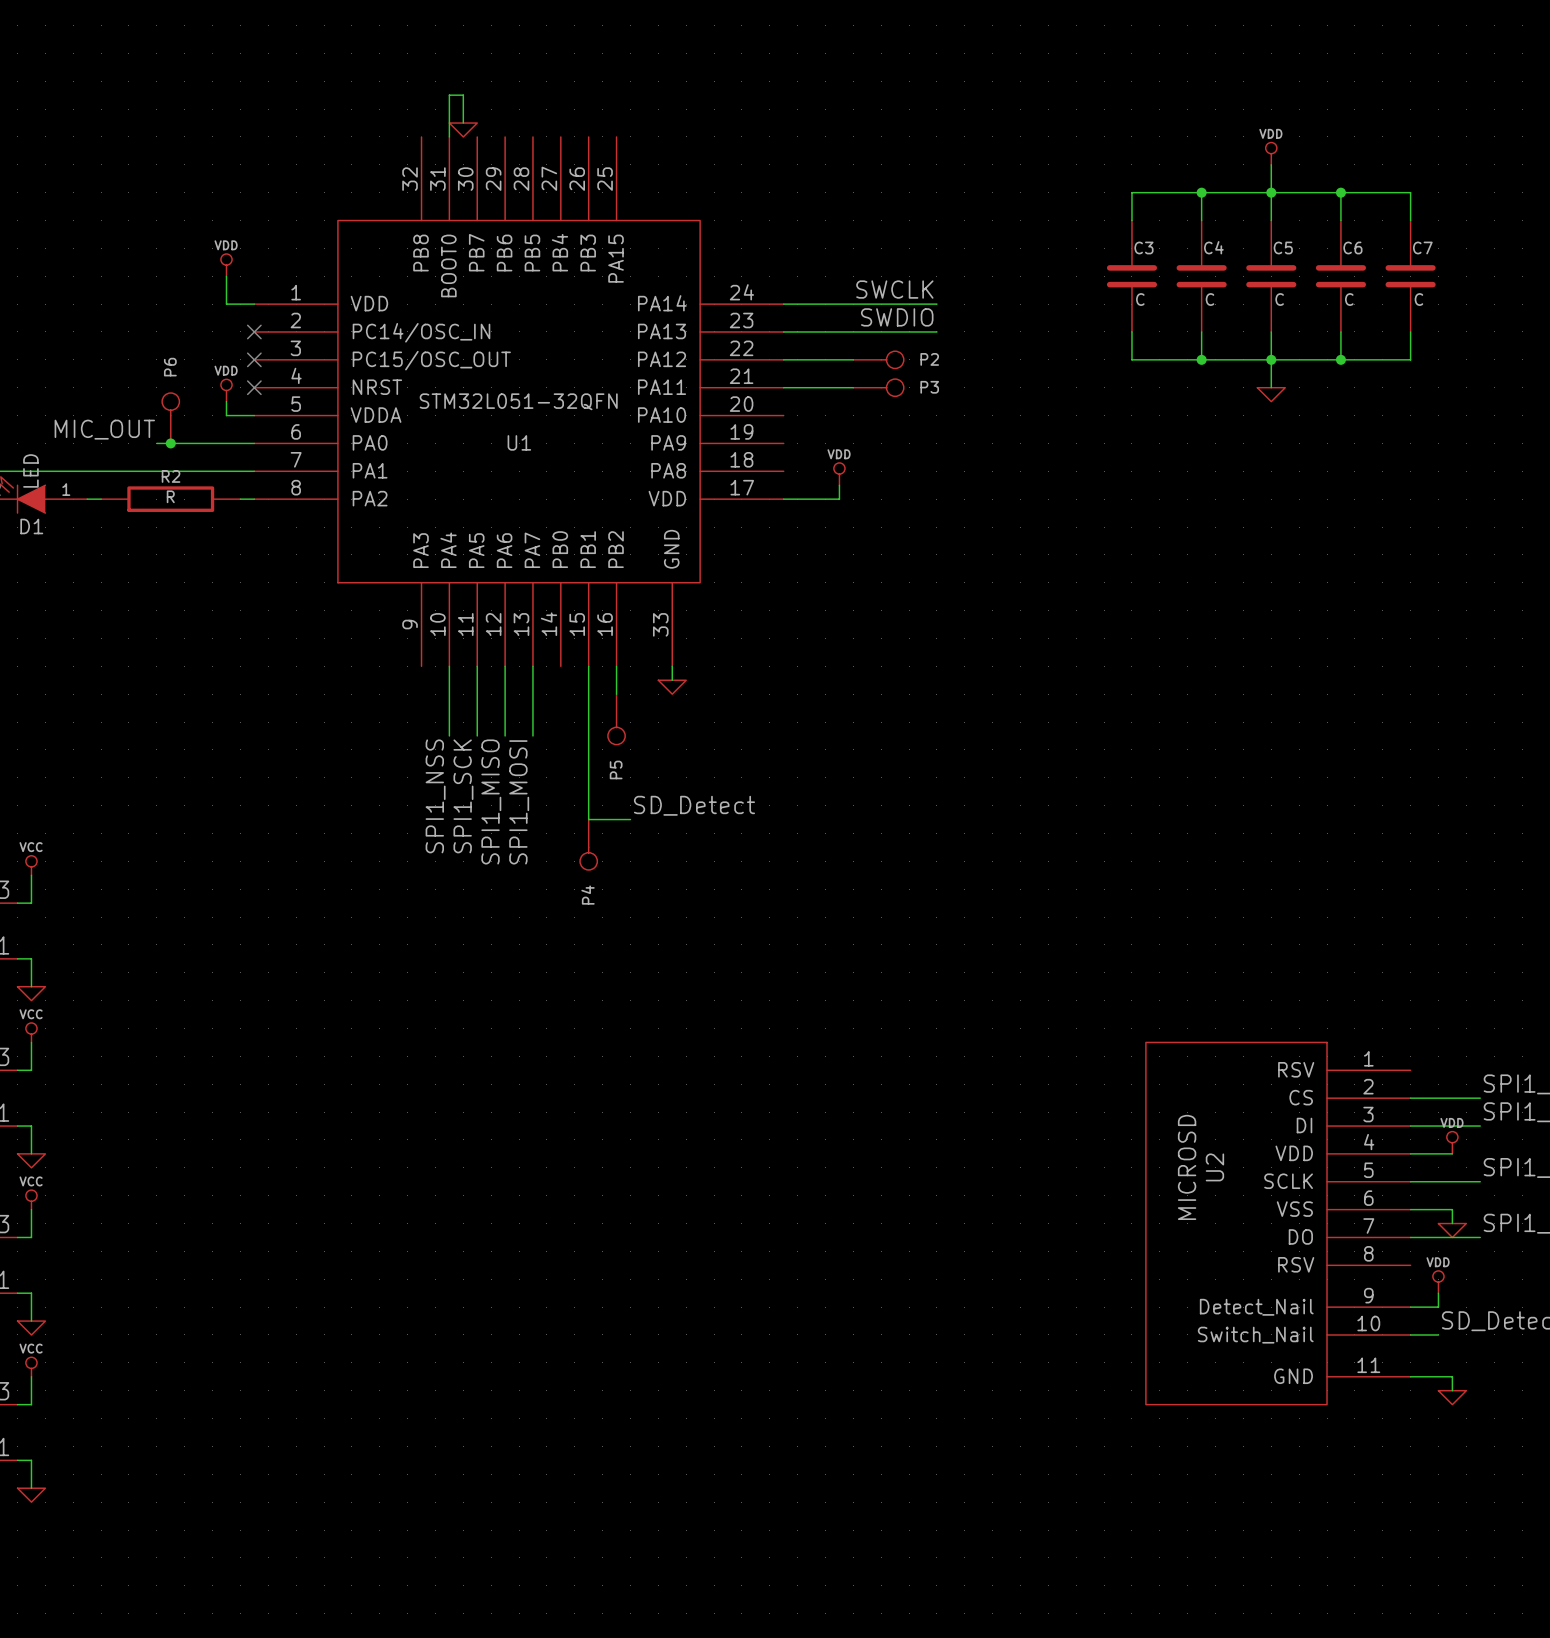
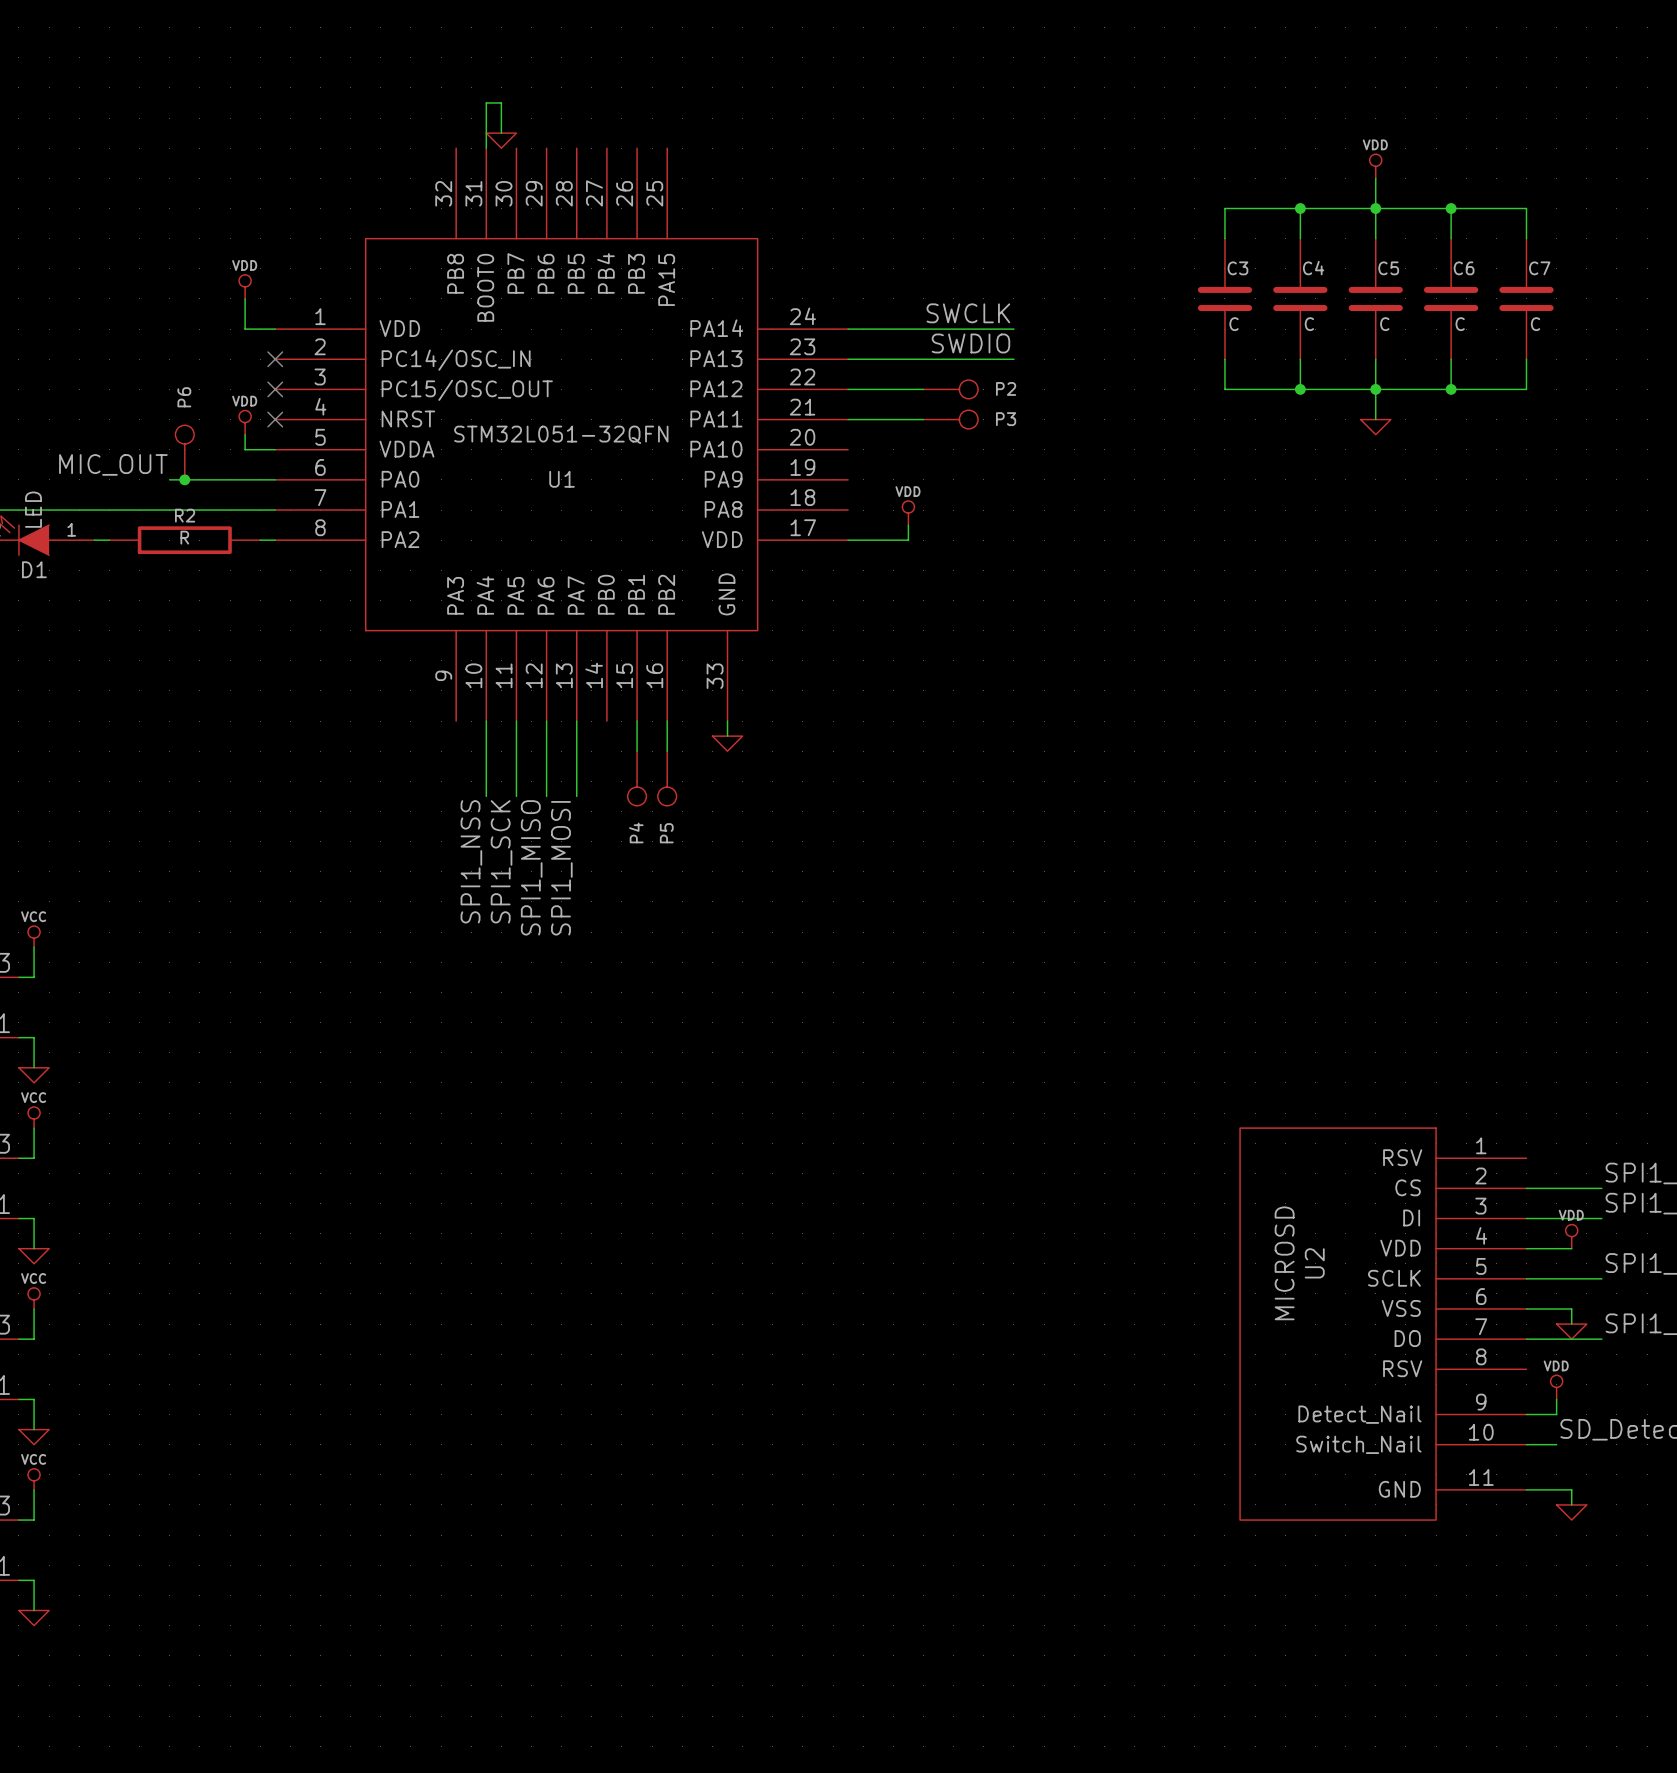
wire: (588, 694) (588, 819) (630, 819) -> none
label: SD_Detect (694, 805) -> none
P4 position: (588, 844) -> (637, 778)

